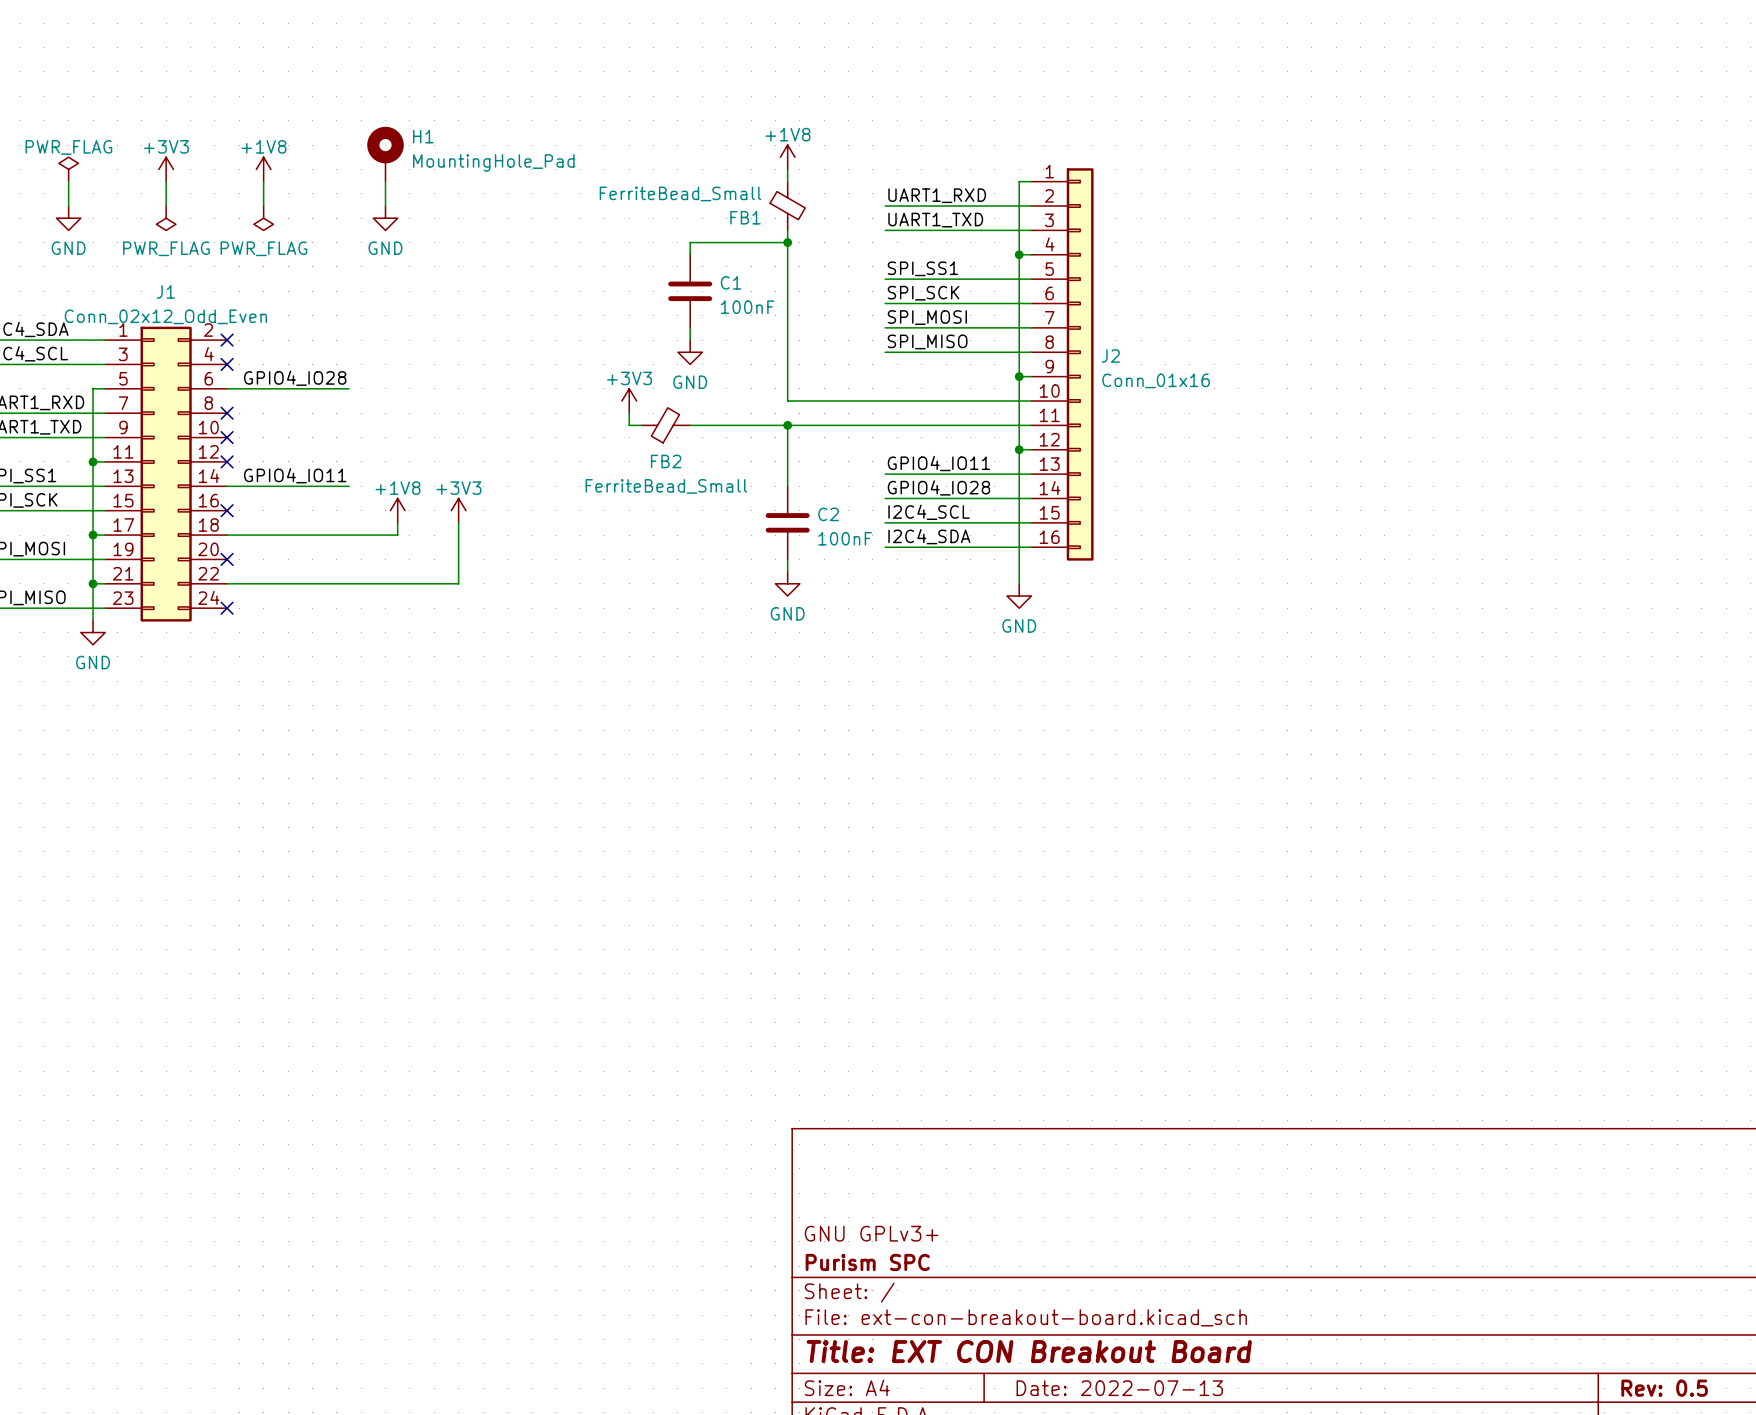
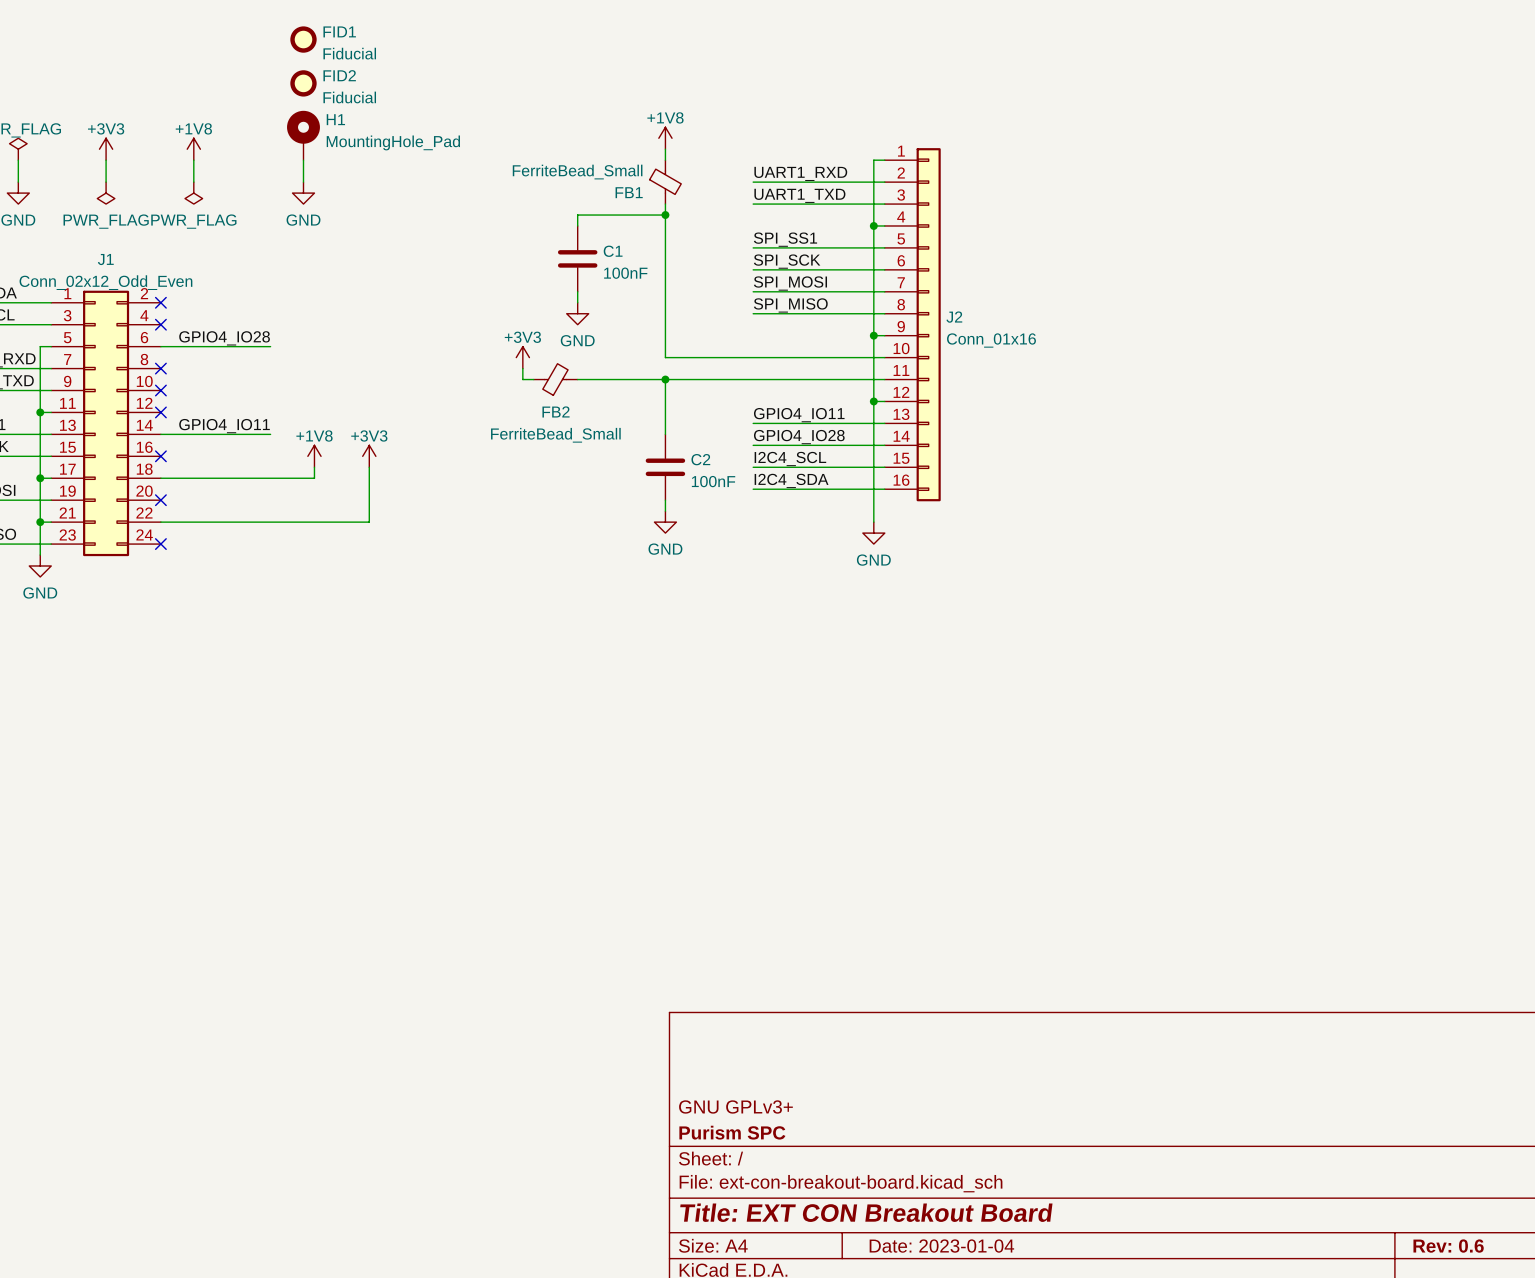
FID1: none -> Fiducial (303, 39)
FID2: none -> Fiducial (303, 83)
title block: Date: 2022-07-13 (1119, 1388) -> Date: 2023-01-04 (941, 1246)
title block: Rev: 0.5 (1664, 1388) -> Rev: 0.6 (1448, 1246)

